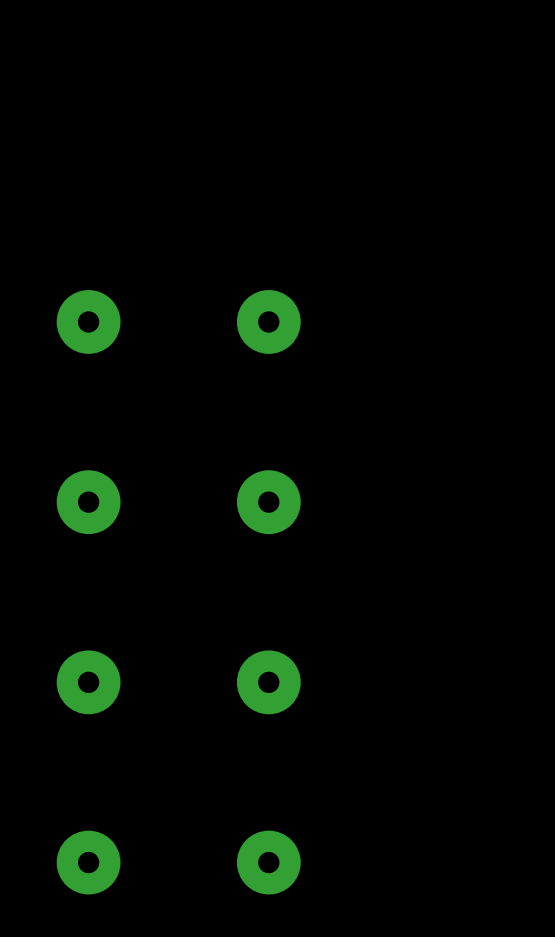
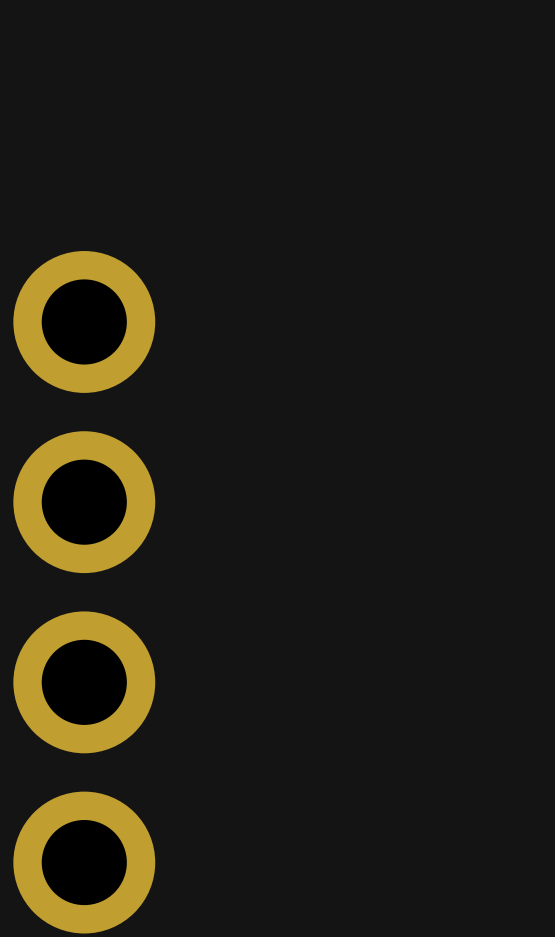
via size: [56, 290, 121, 354] -> [13, 251, 156, 393]
via: (268, 321) -> none
via size: [56, 470, 121, 535] -> [13, 431, 156, 574]
via: (268, 502) -> none
via size: [56, 650, 121, 715] -> [13, 611, 156, 754]
via: (268, 682) -> none
via size: [56, 830, 121, 895] -> [13, 791, 156, 934]
via: (268, 862) -> none

